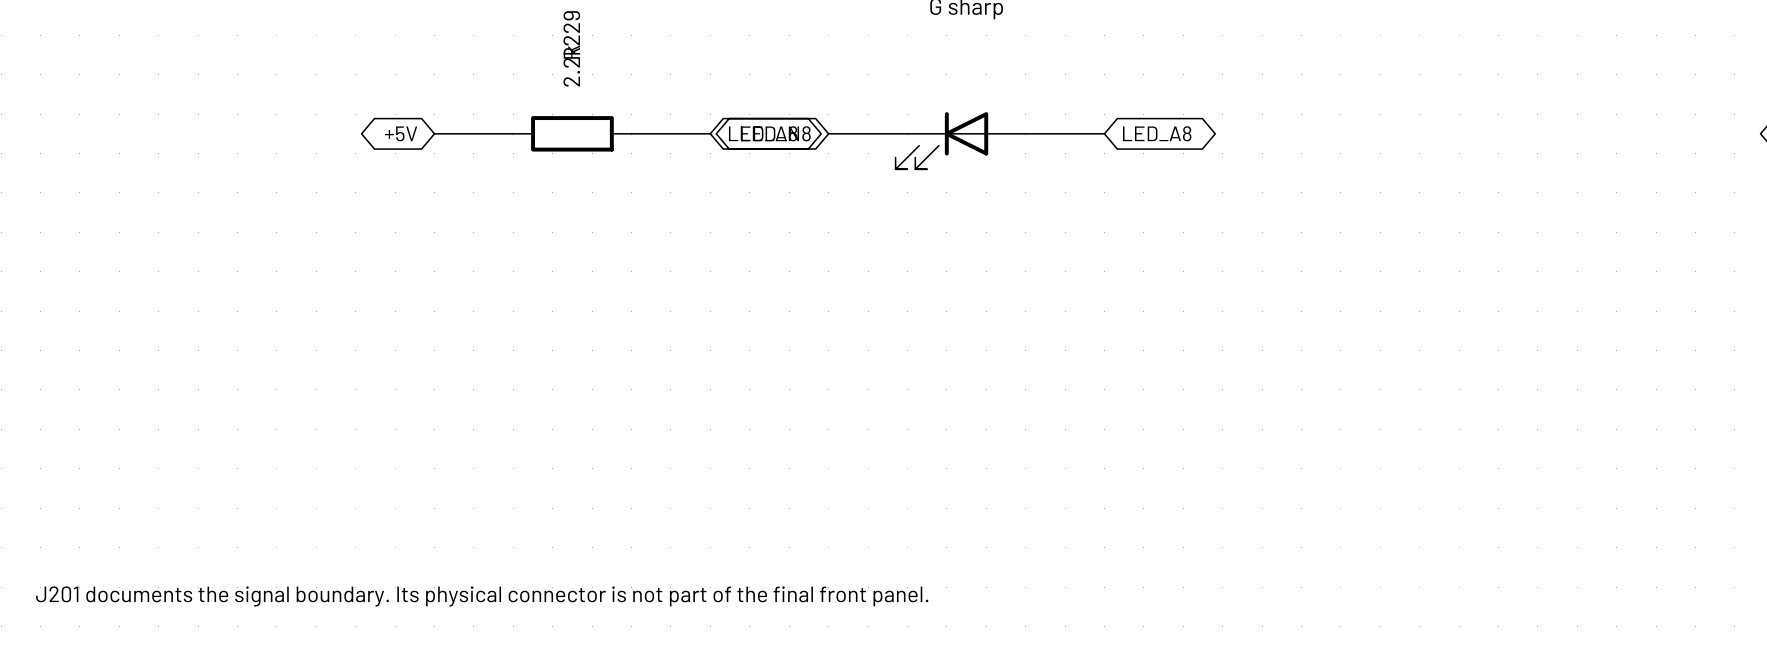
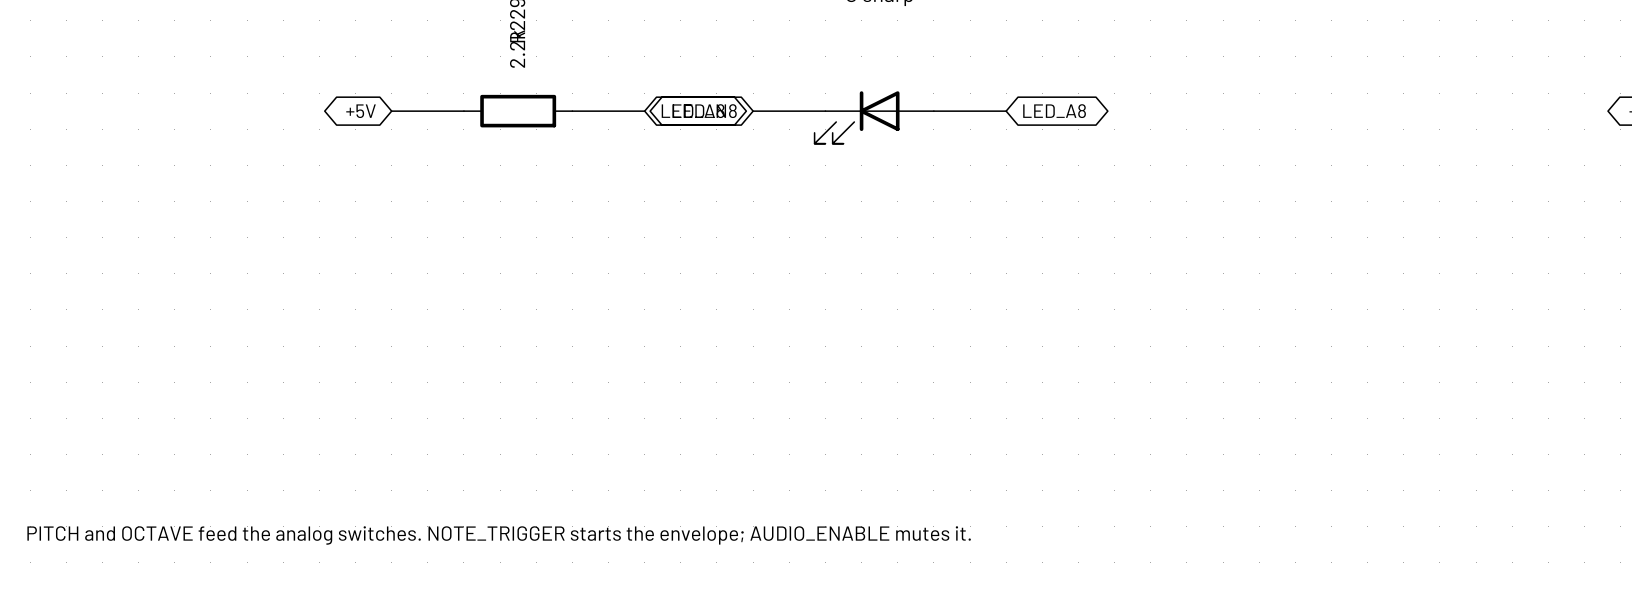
text: J201 documents the signal boundary. Its physical connector is not part of the final front panel. (482, 596) -> PITCH and OCTAVE feed the analog switches. NOTE_TRIGGER starts the envelope; AUDIO_ENABLE mutes it. (499, 535)

